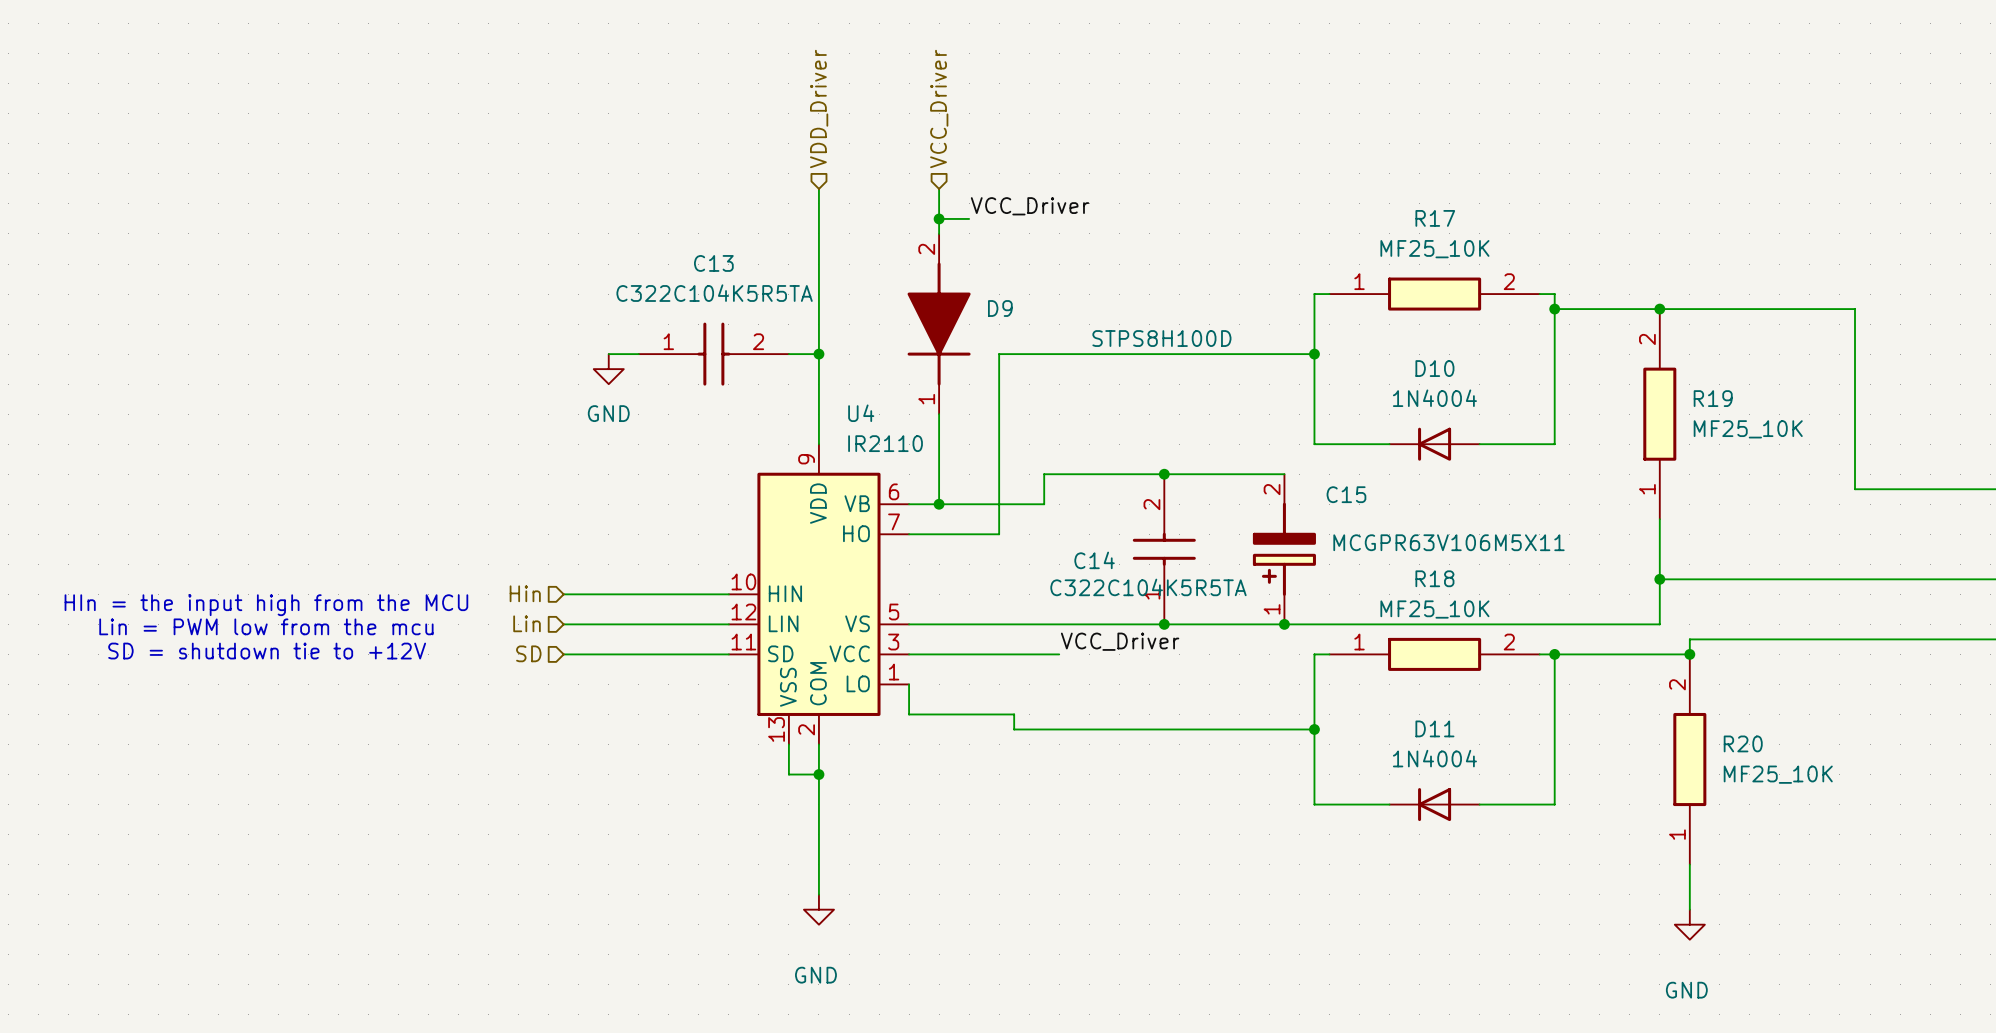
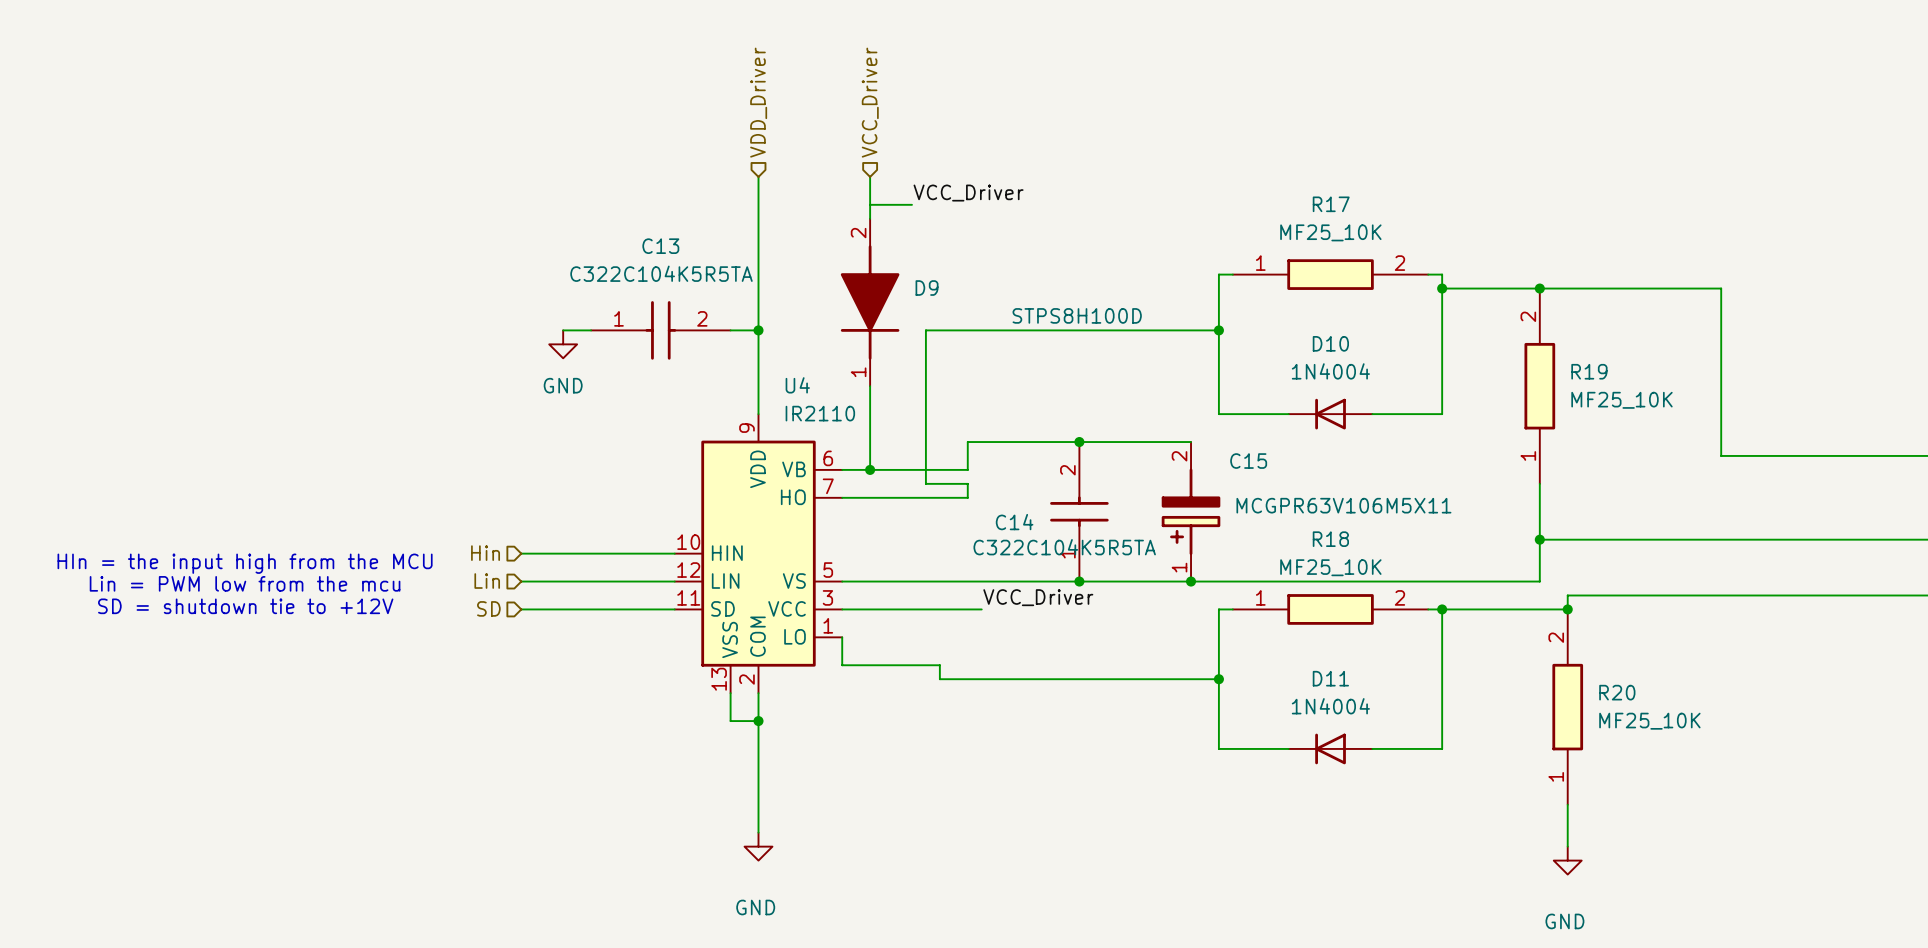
label position: VCC_Driver (1030, 206) -> VCC_Driver (968, 193)
junction: (939, 218) -> none
wire: none -> (898, 204) (911, 204)
wire: (999, 519) (999, 534) -> (925, 483) (967, 483) (967, 497) (925, 497)

